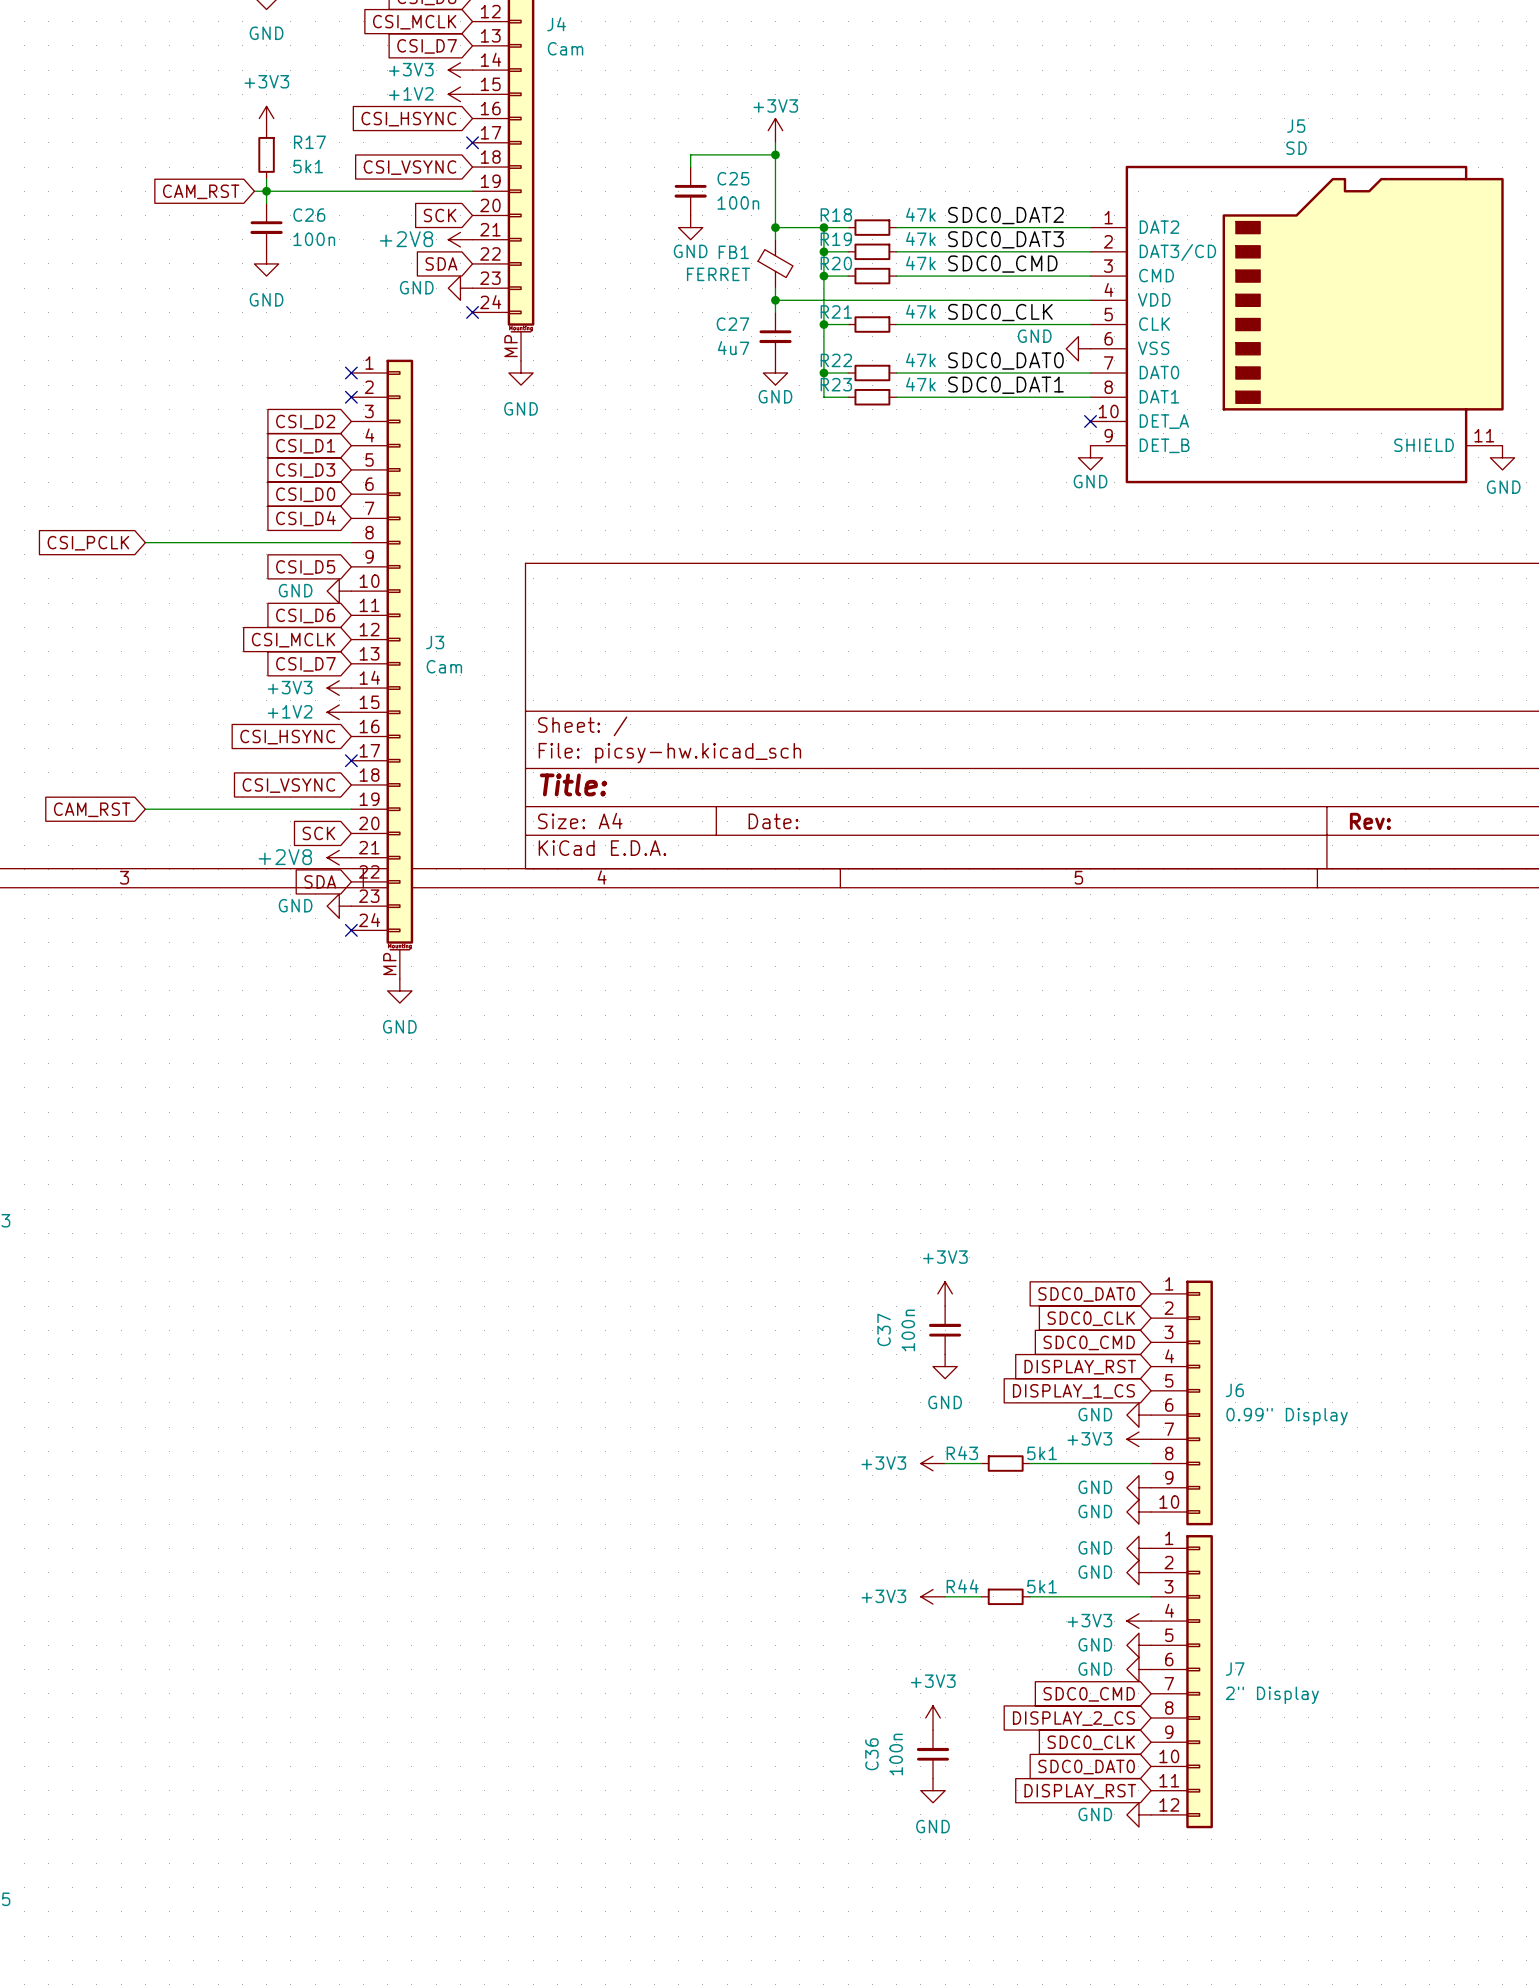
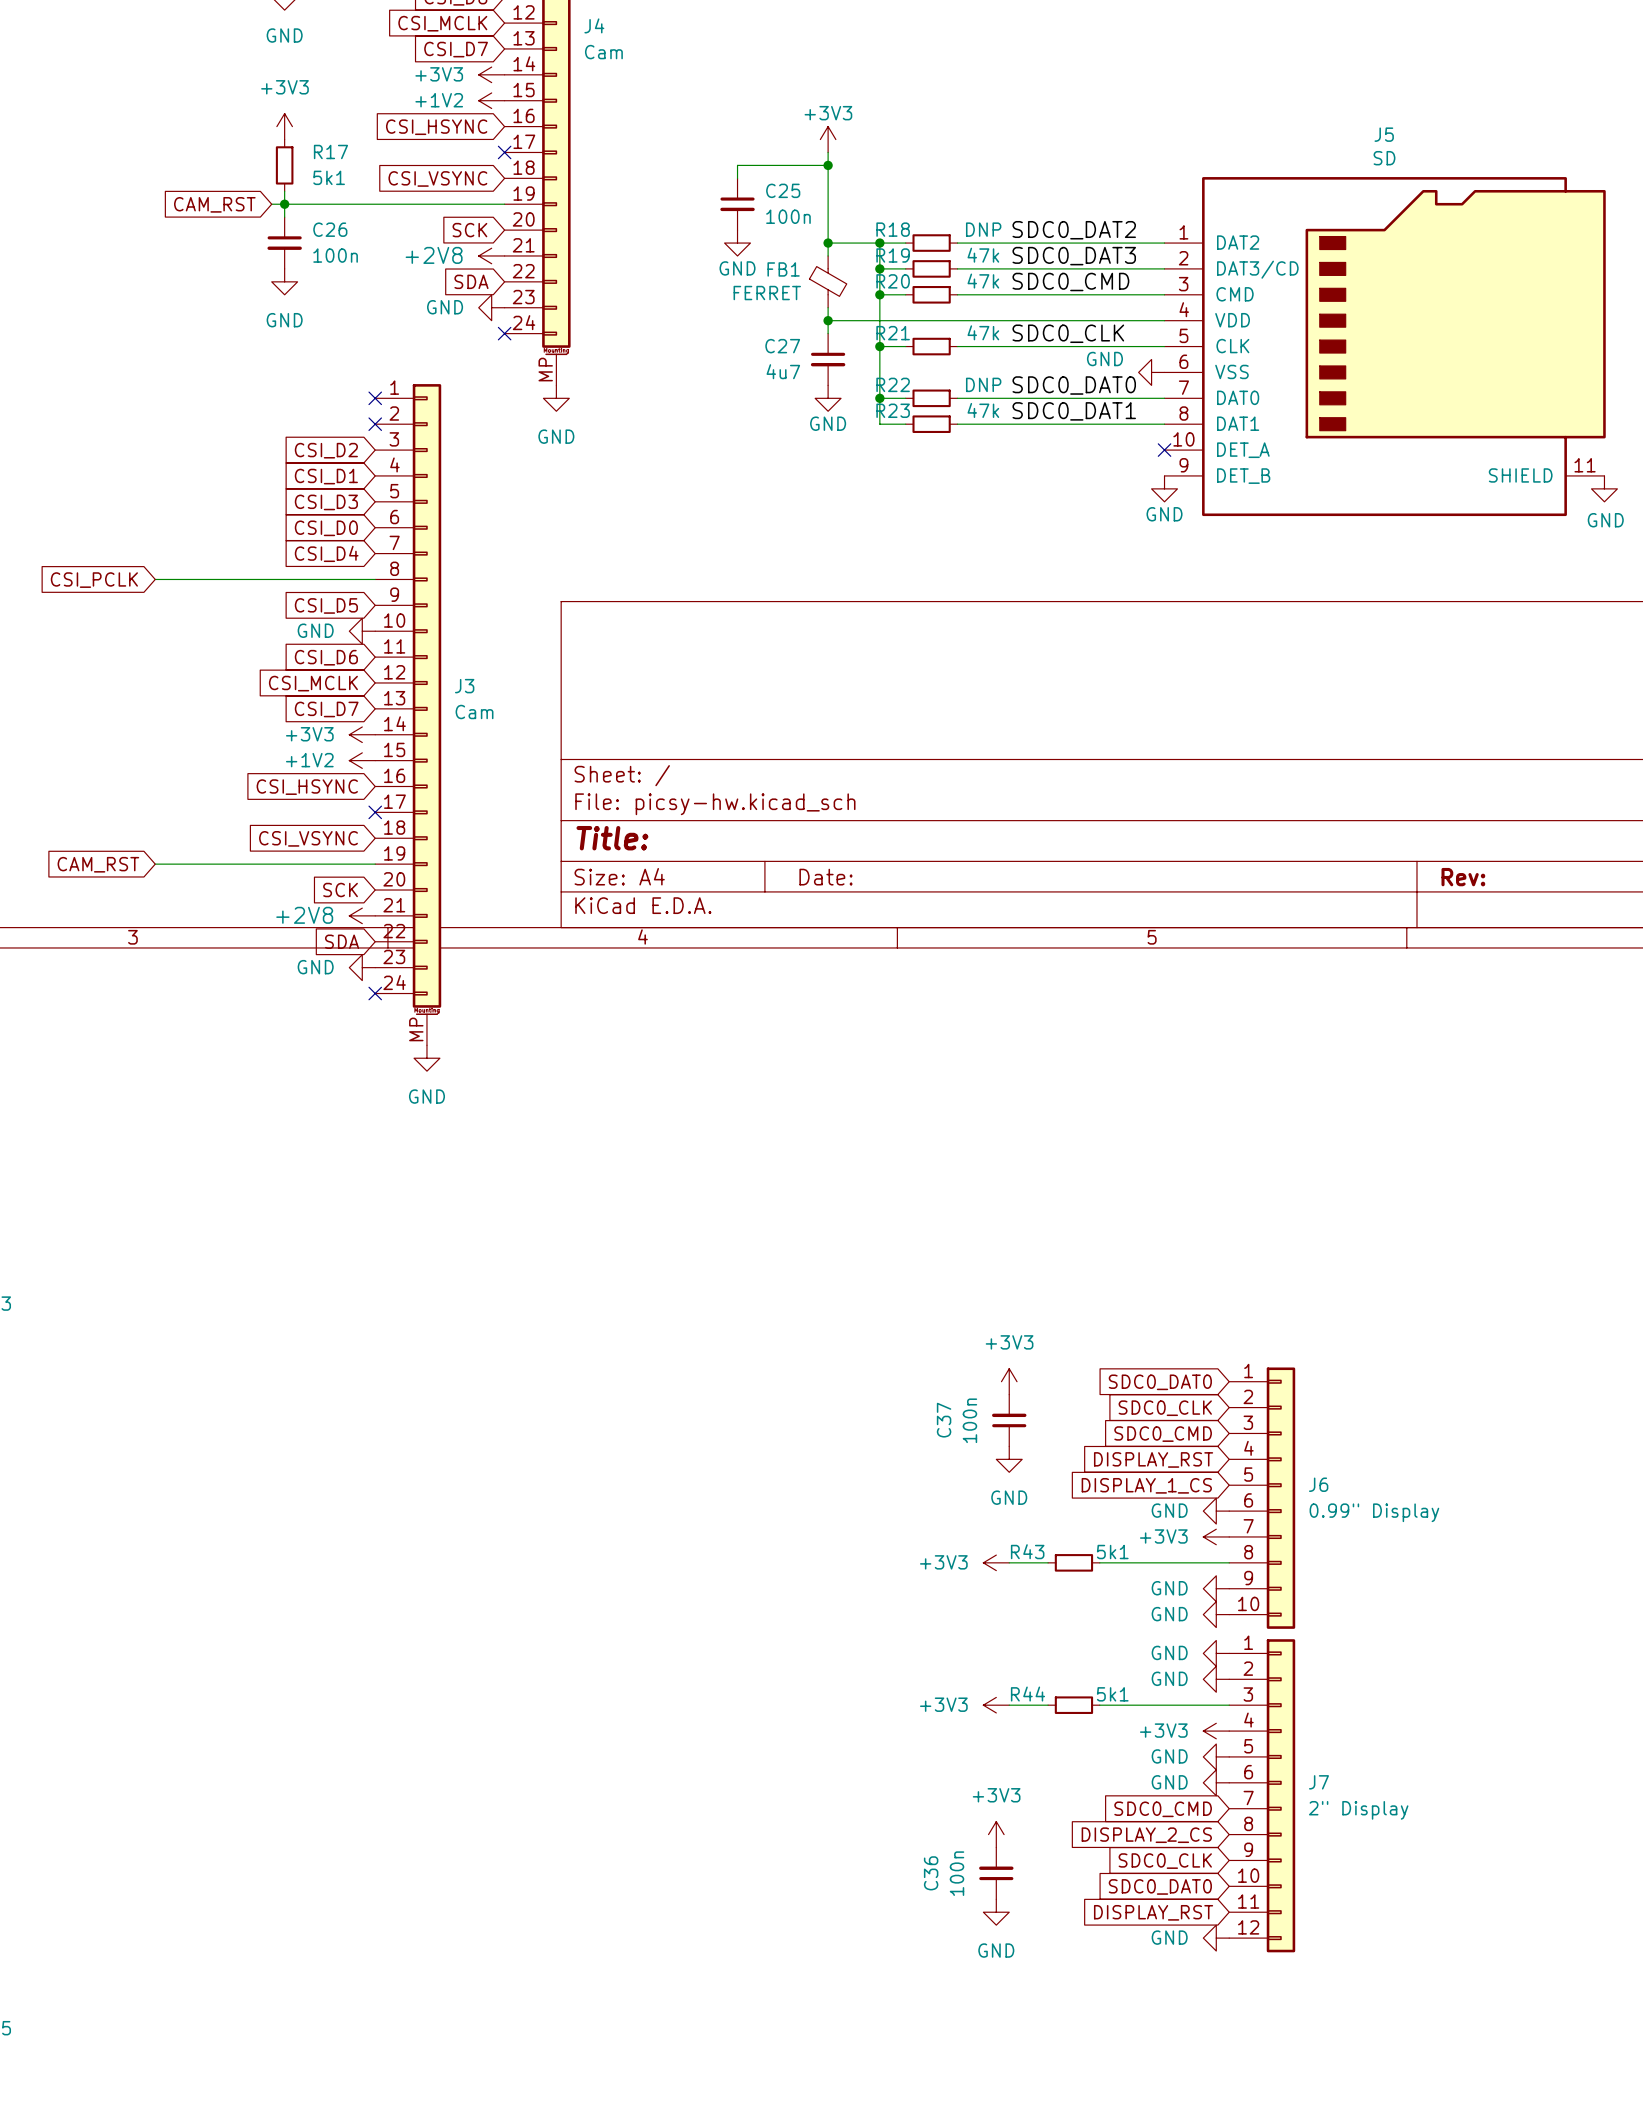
R18 value: 47k (920, 214) -> DNP (983, 229)
R22 value: 47k (920, 360) -> DNP (983, 384)

